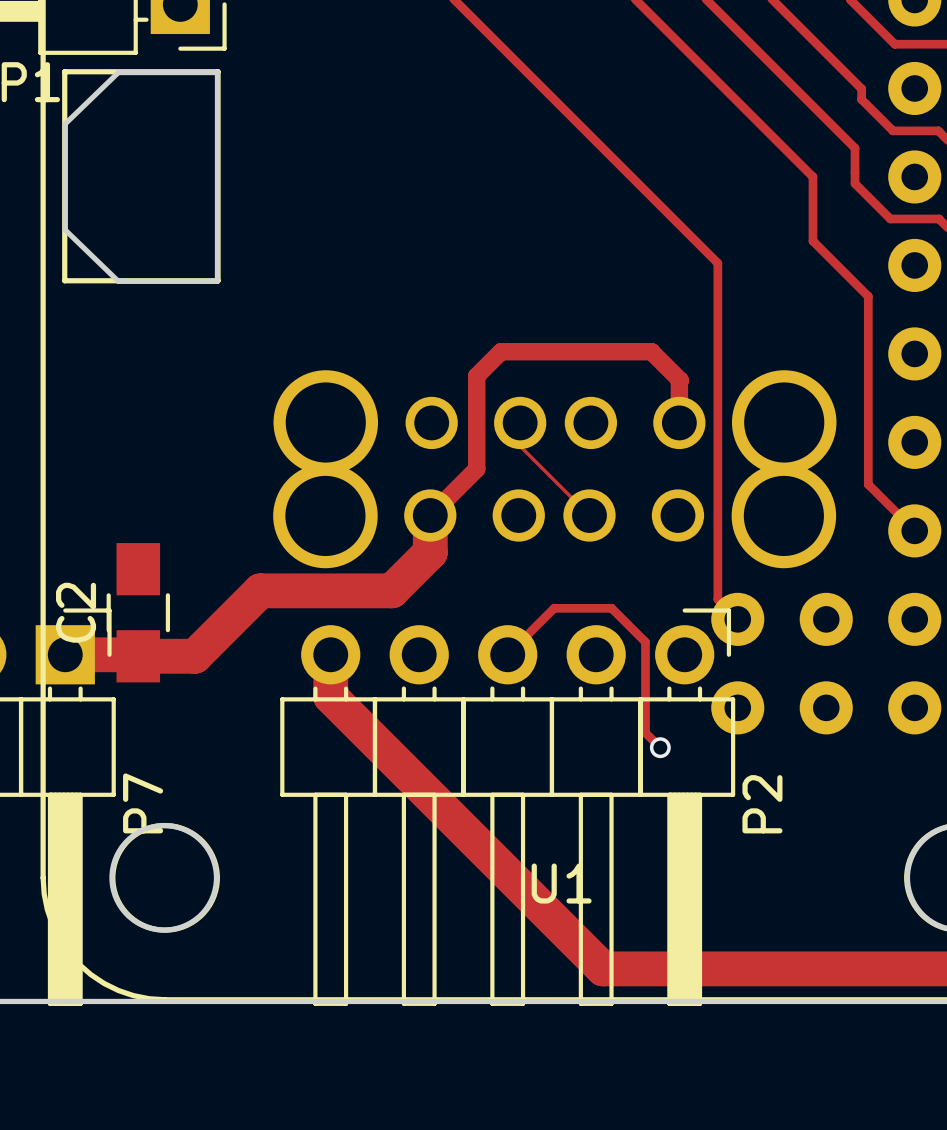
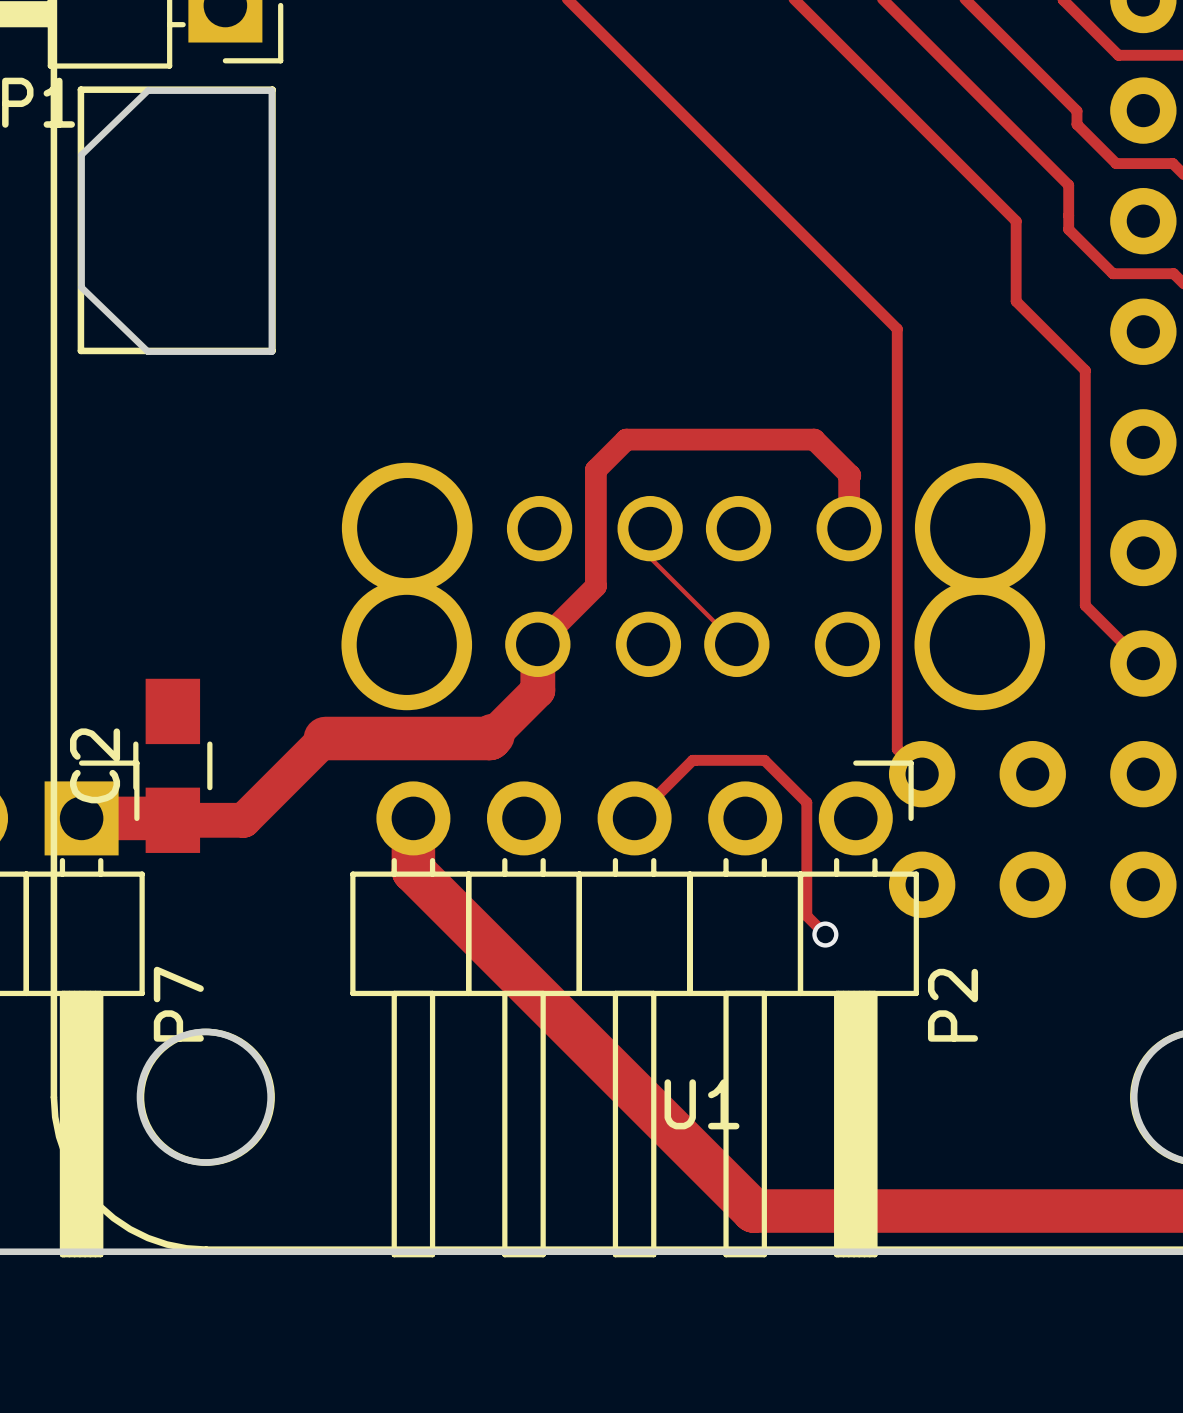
track width: thick (430, 515) (430, 552) (394, 588) -> thin (537, 644) (537, 690) (492, 735)
track width: thick (260, 590) (194, 656) (138, 656) -> thin (325, 738) (243, 820) (172, 820)

